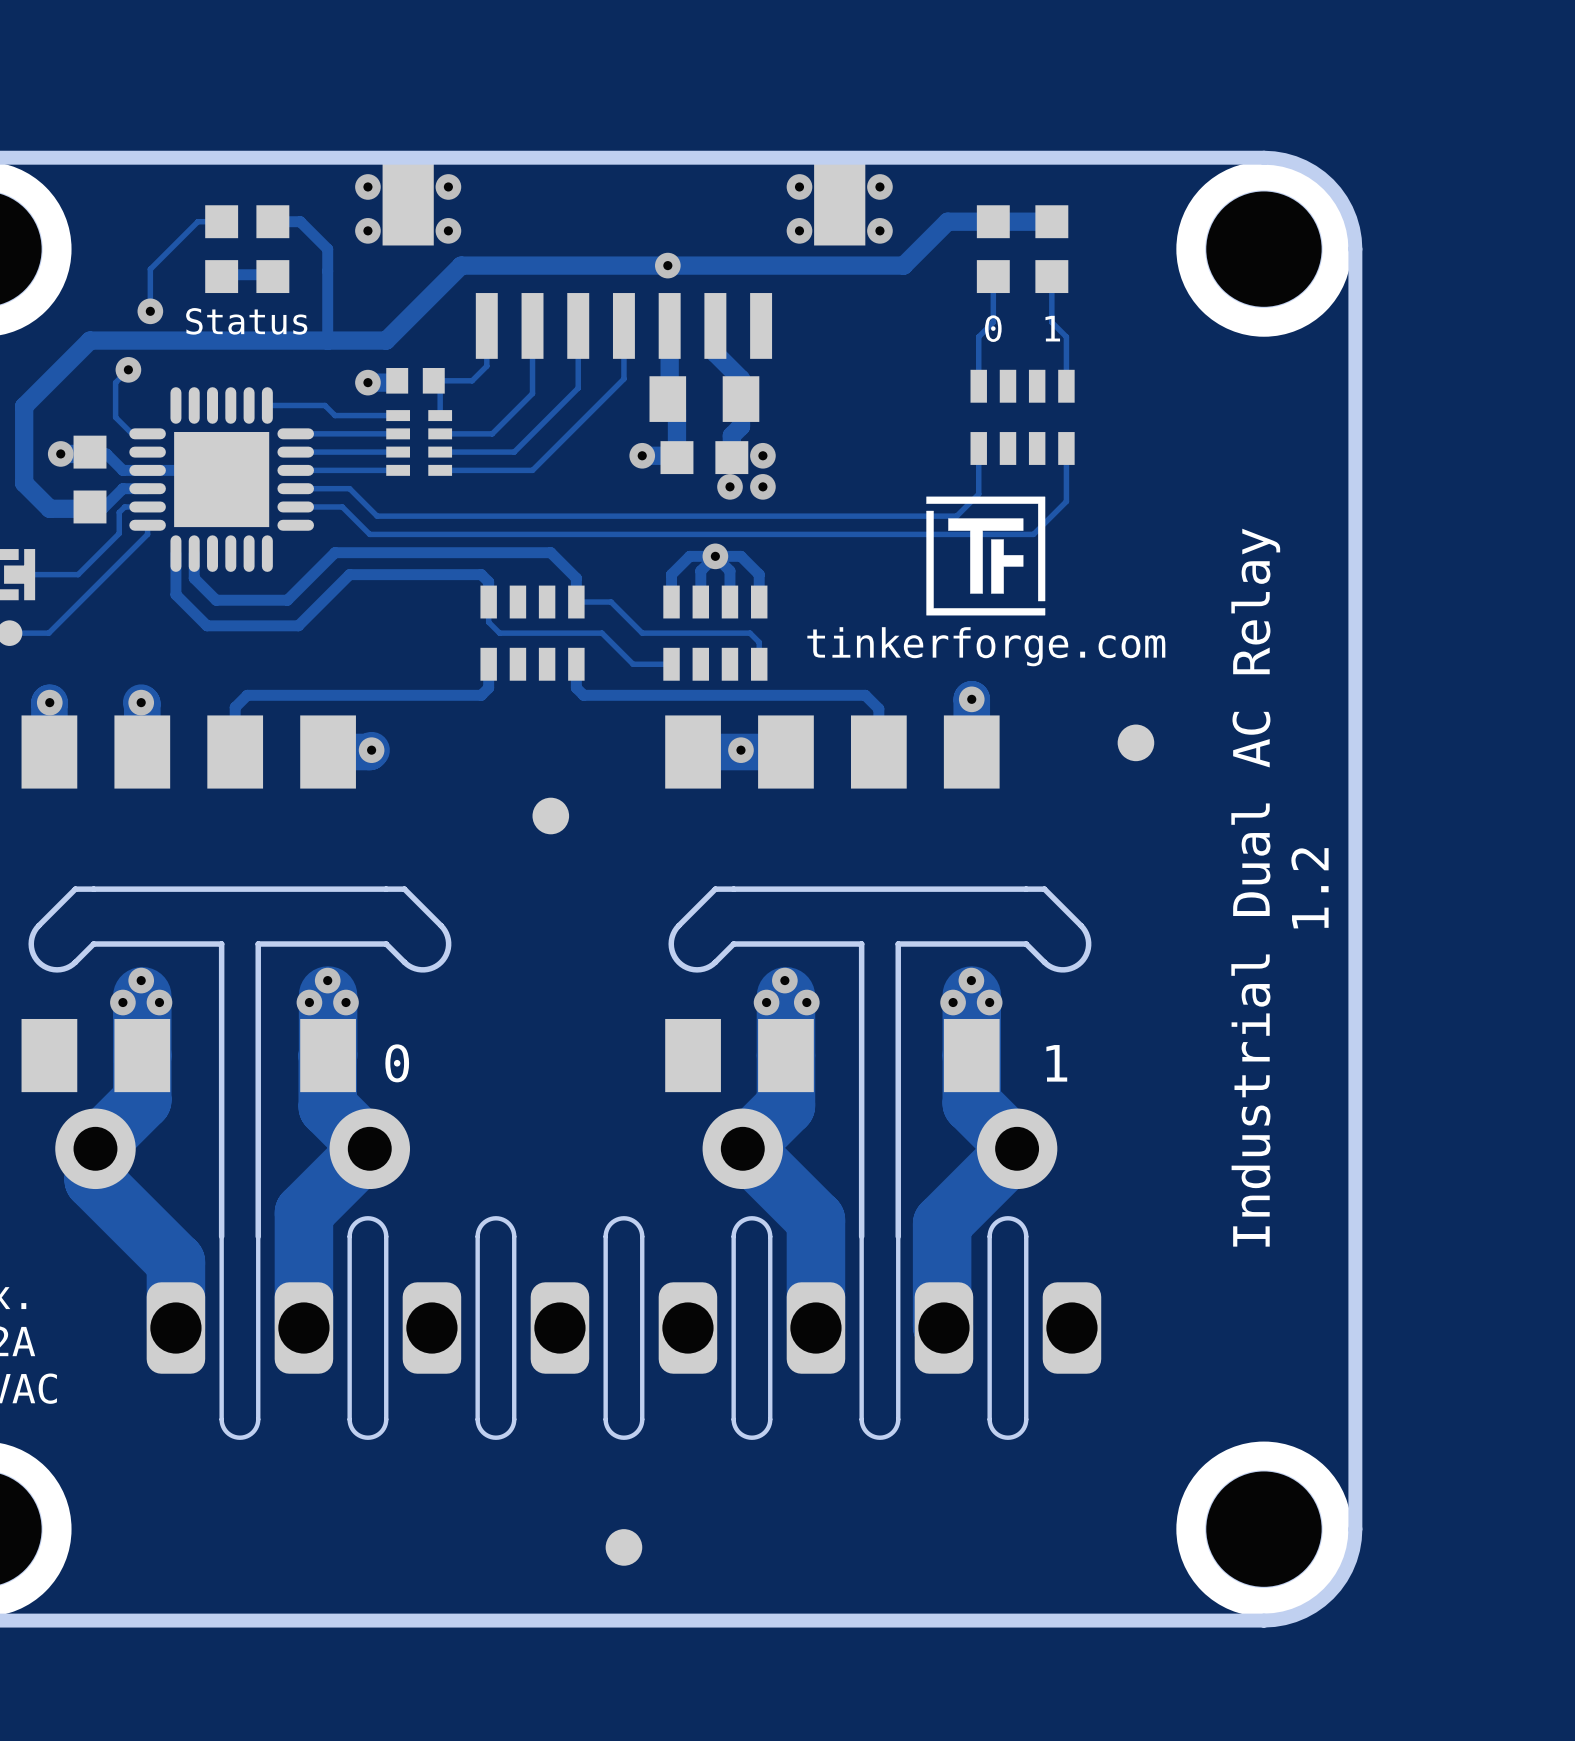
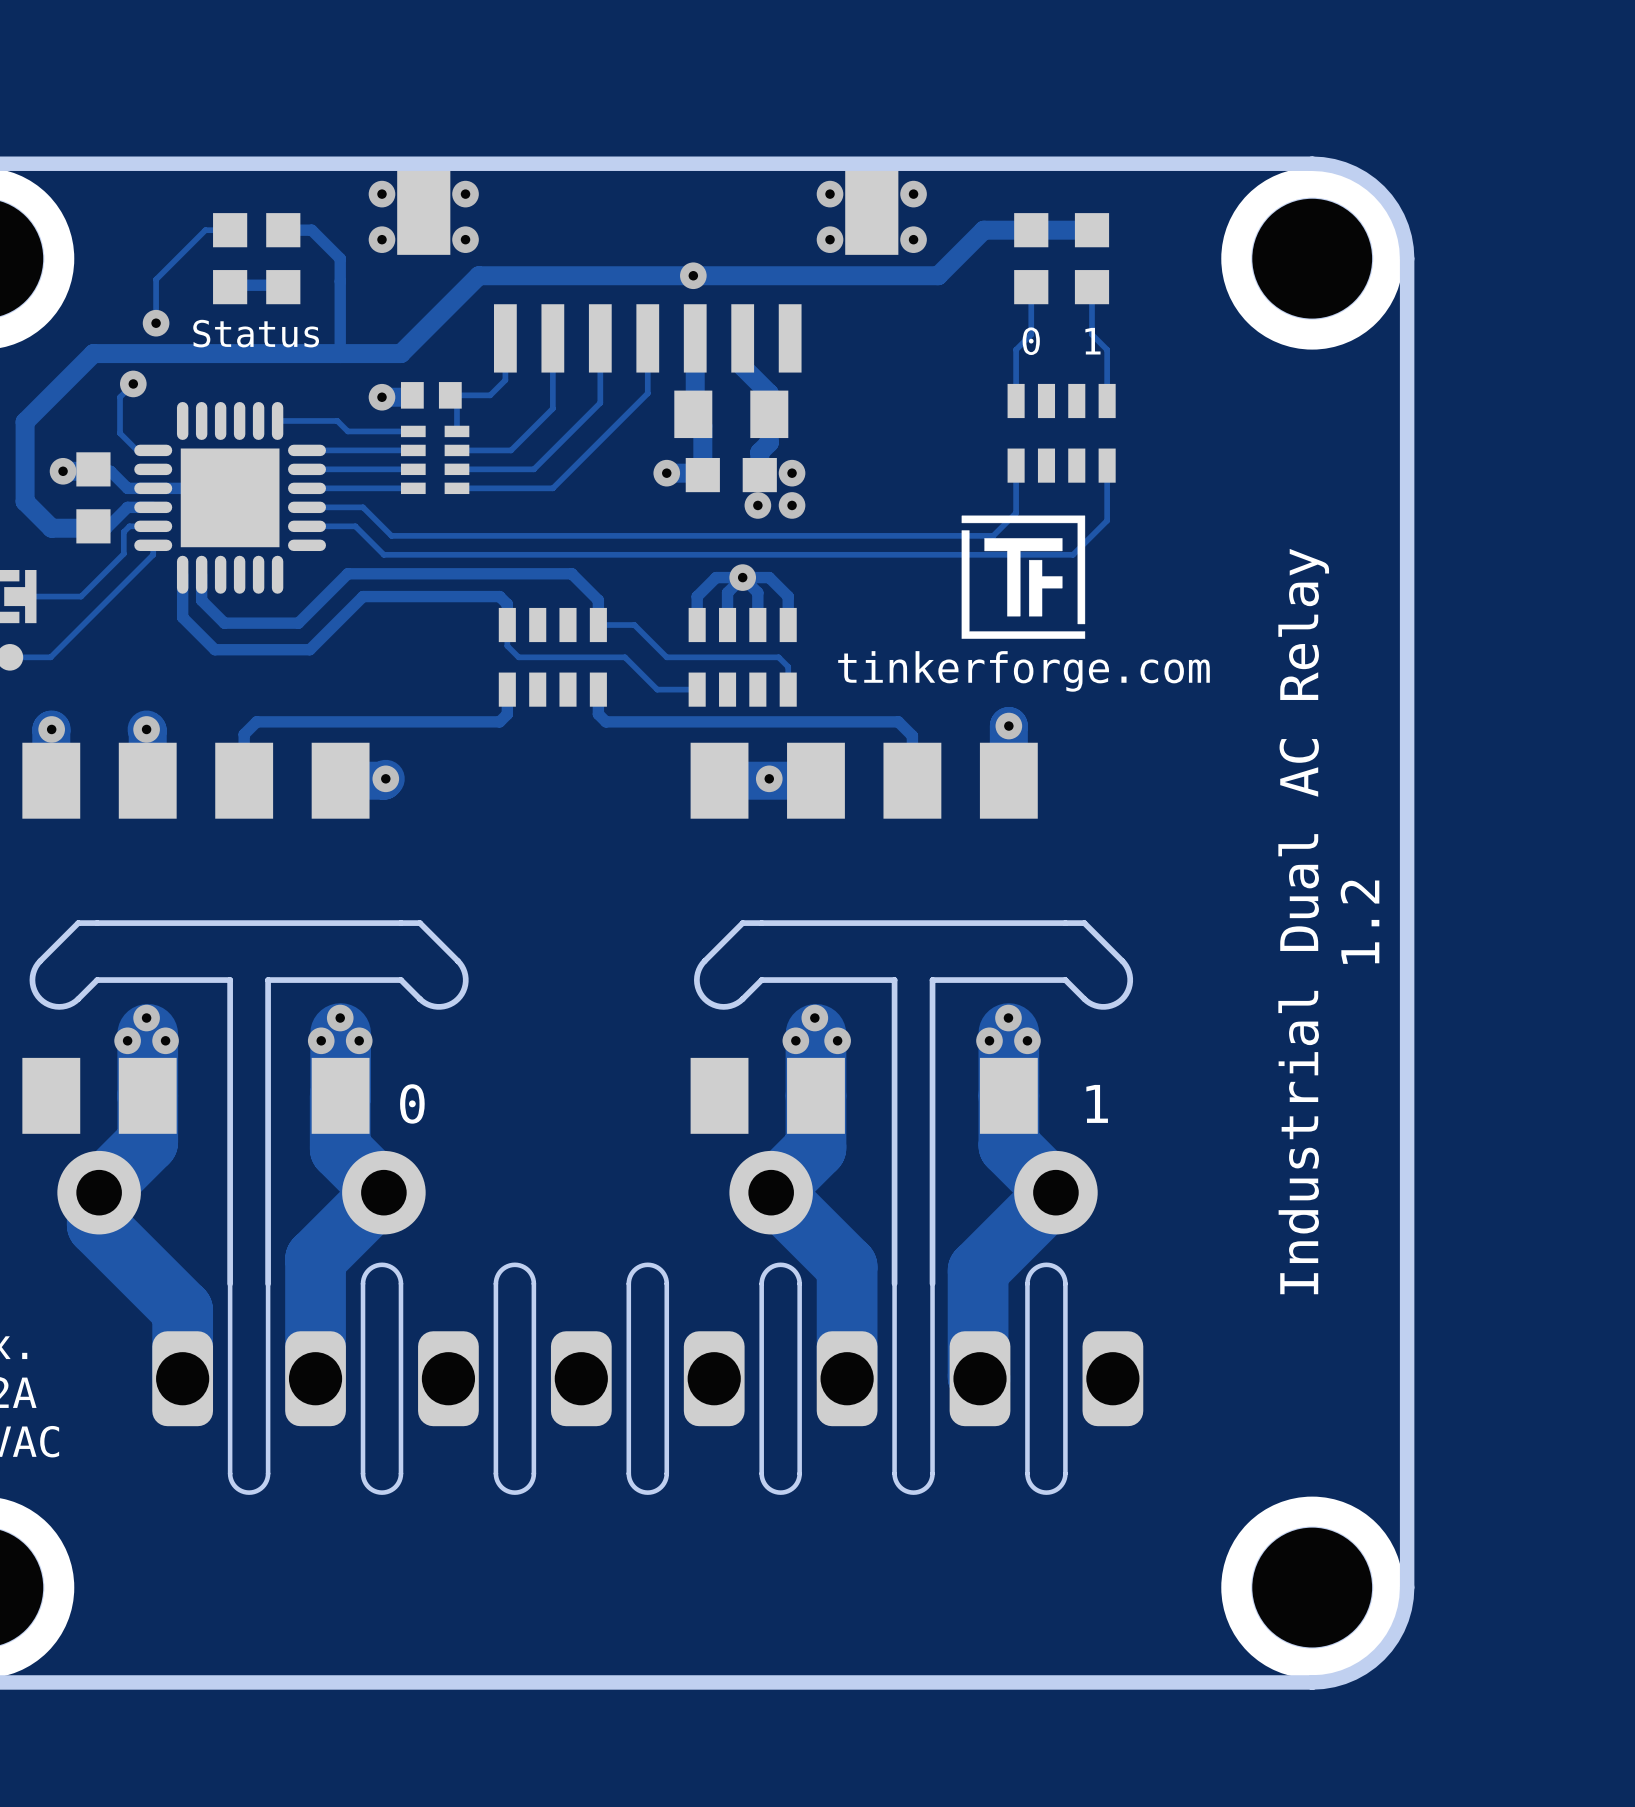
part: (1135, 742) -> none
part: (550, 816) -> none
part: (623, 1547) -> none

